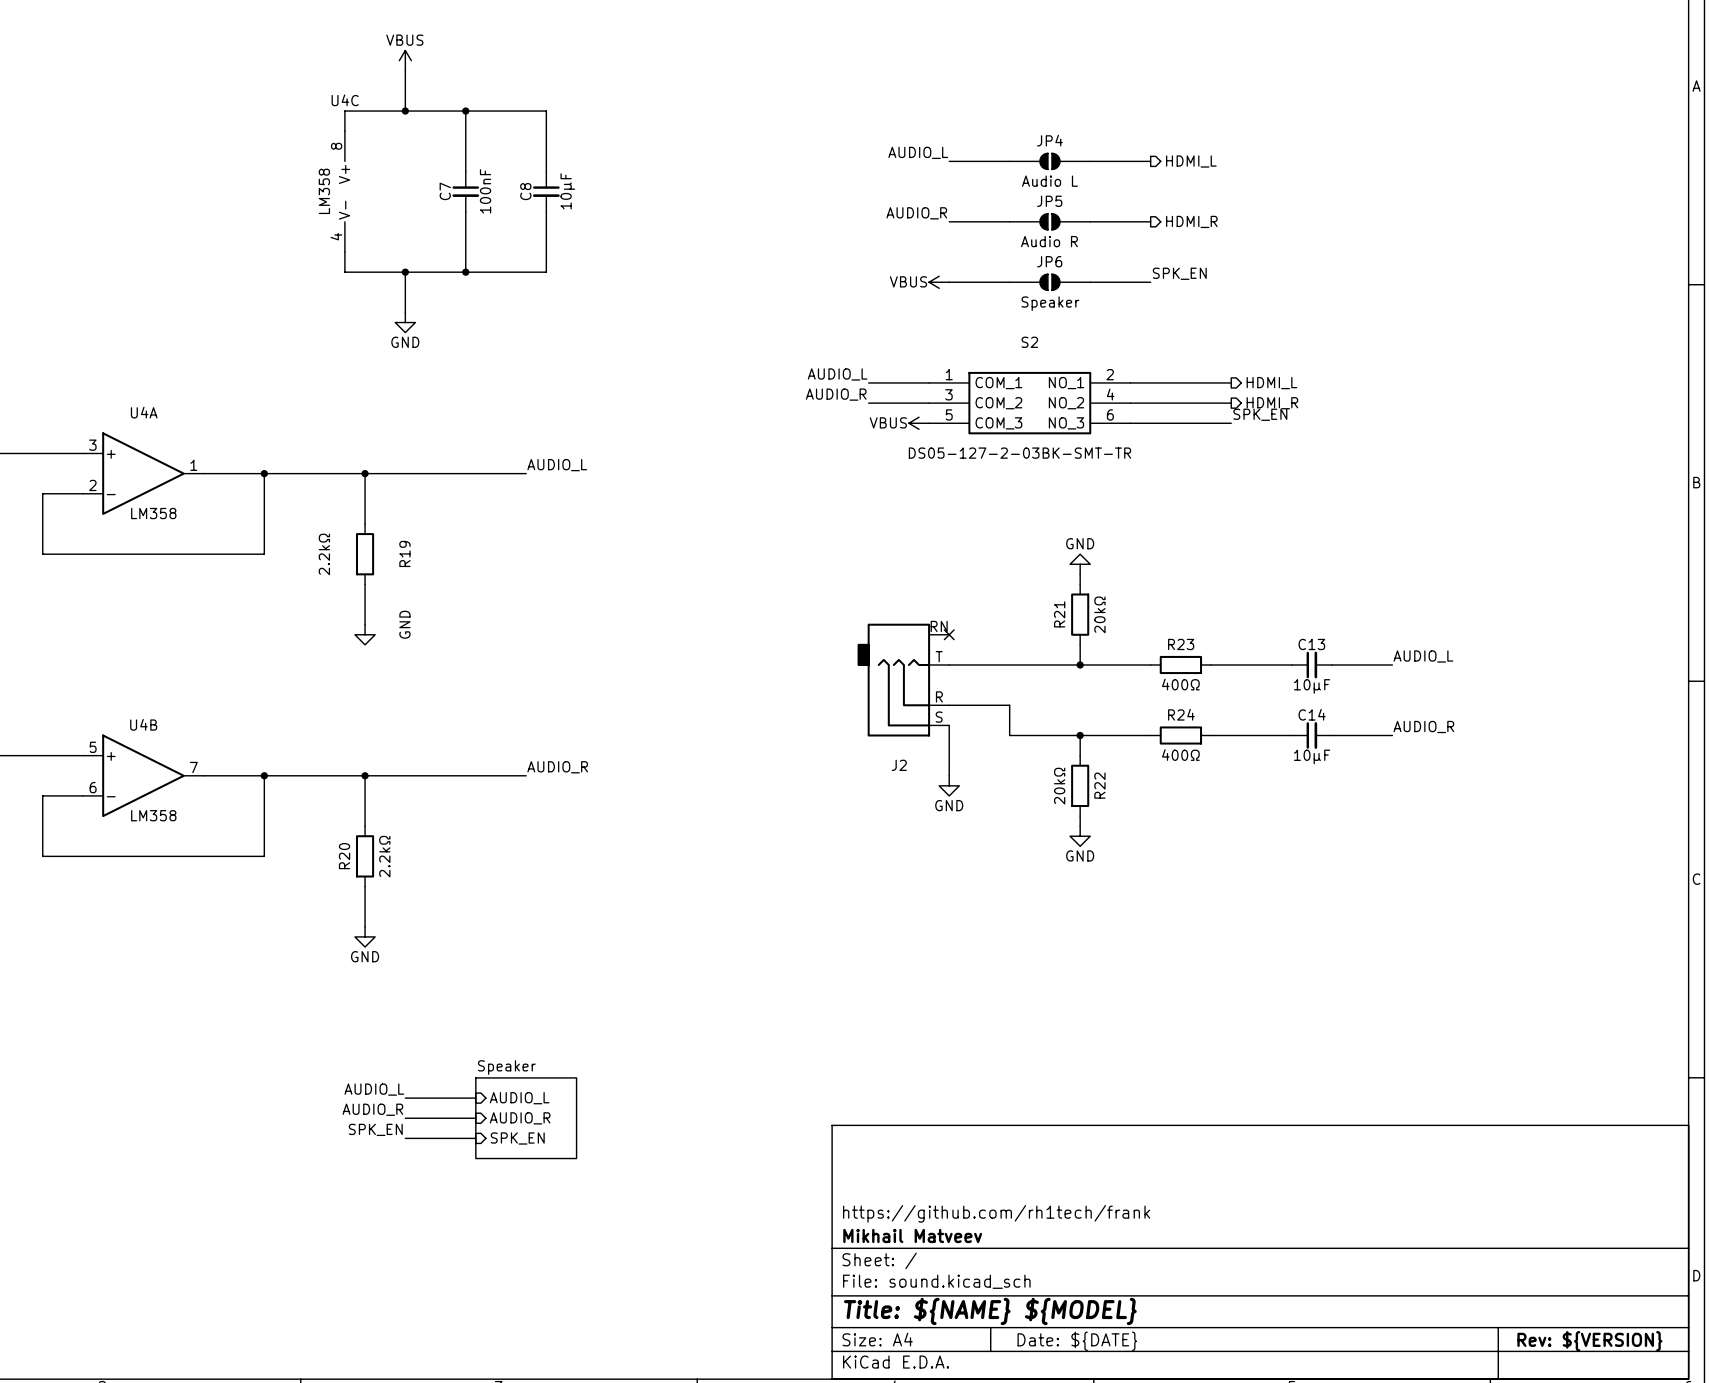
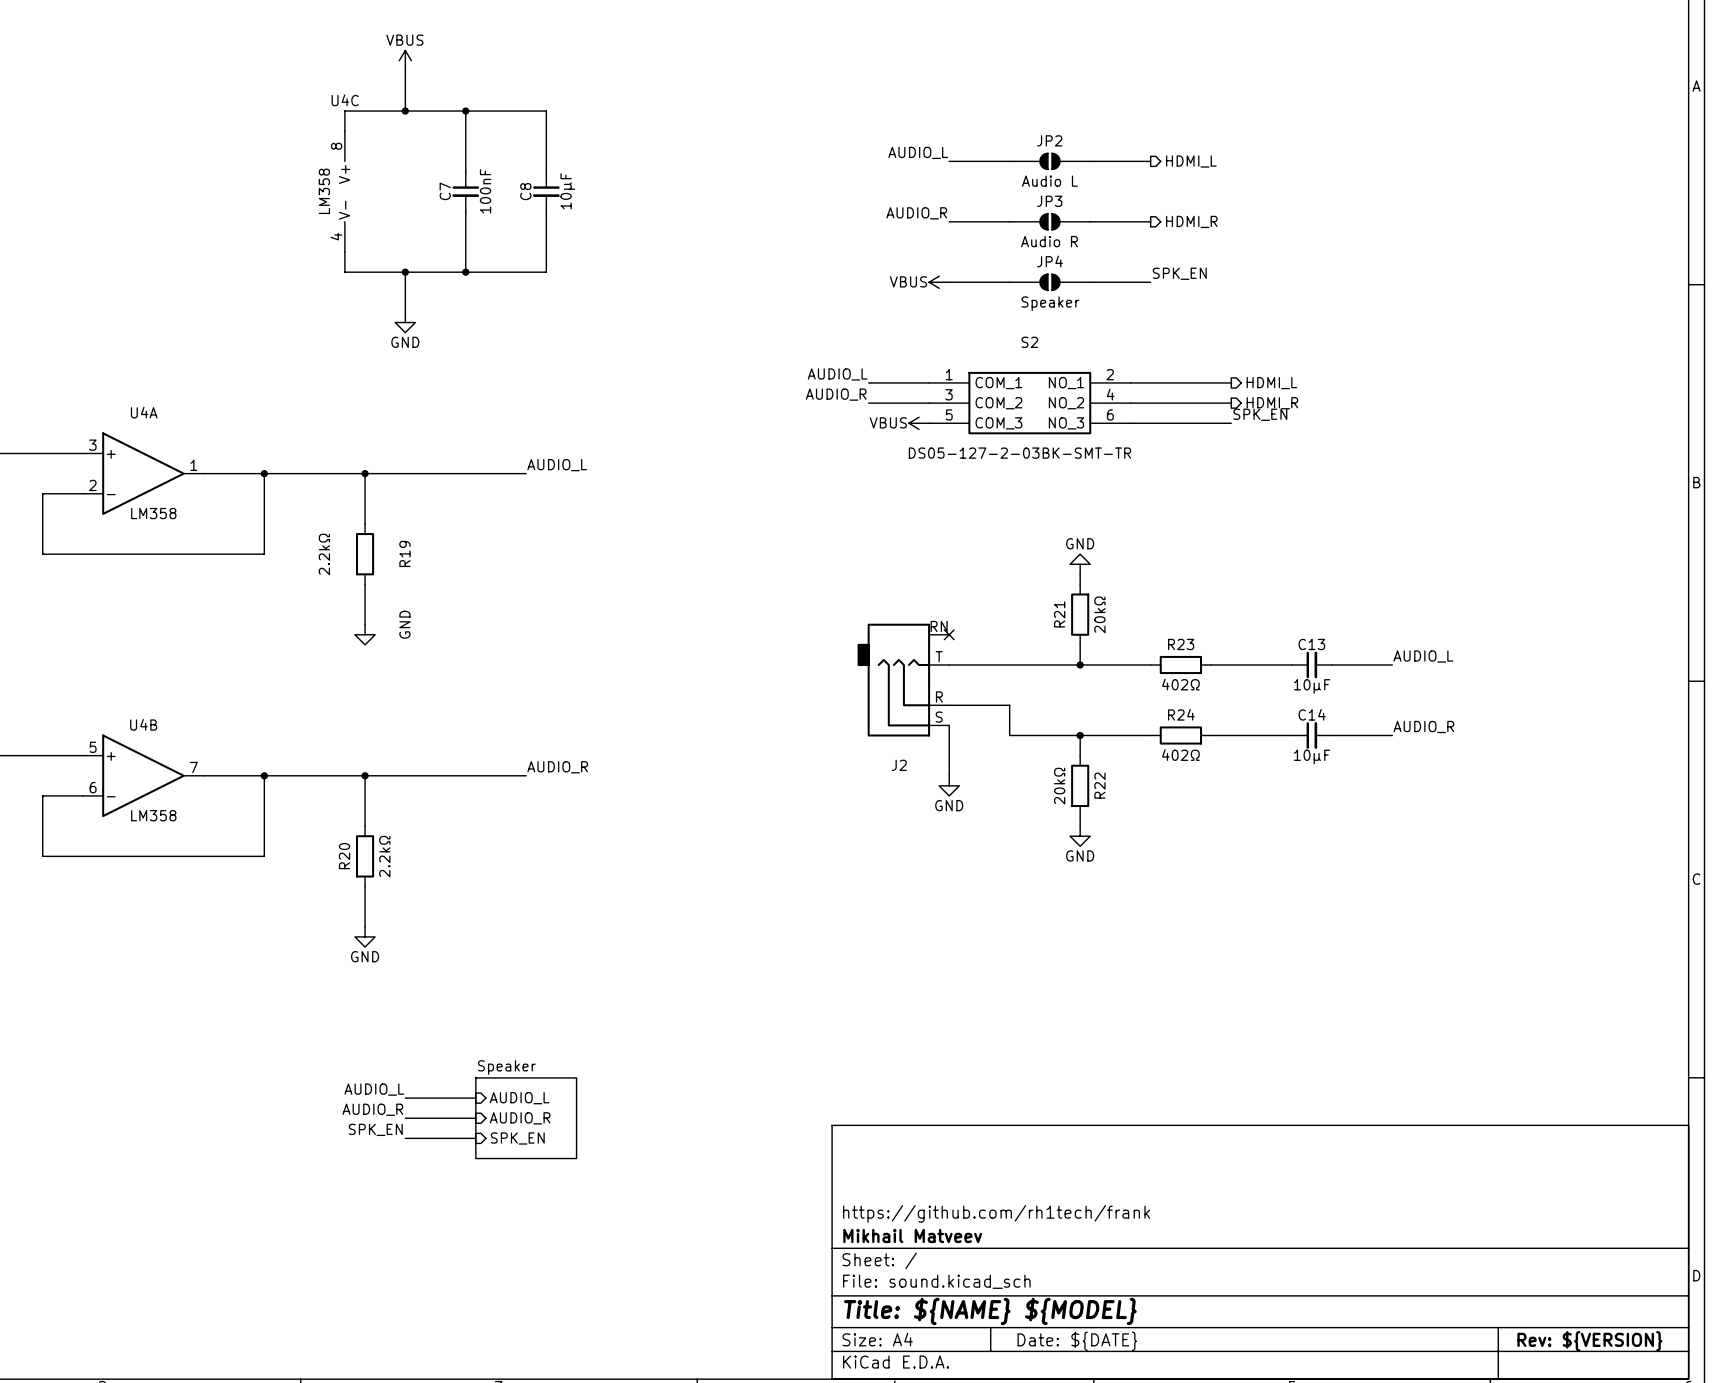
JP4 name: JP4 (1049, 140) -> JP2 (1049, 140)
JP5 name: JP5 (1049, 201) -> JP3 (1049, 201)
JP6 name: JP6 (1049, 261) -> JP4 (1049, 261)
R23 value: 400Ω (1180, 684) -> 402Ω (1180, 684)
R24 value: 400Ω (1180, 755) -> 402Ω (1180, 755)

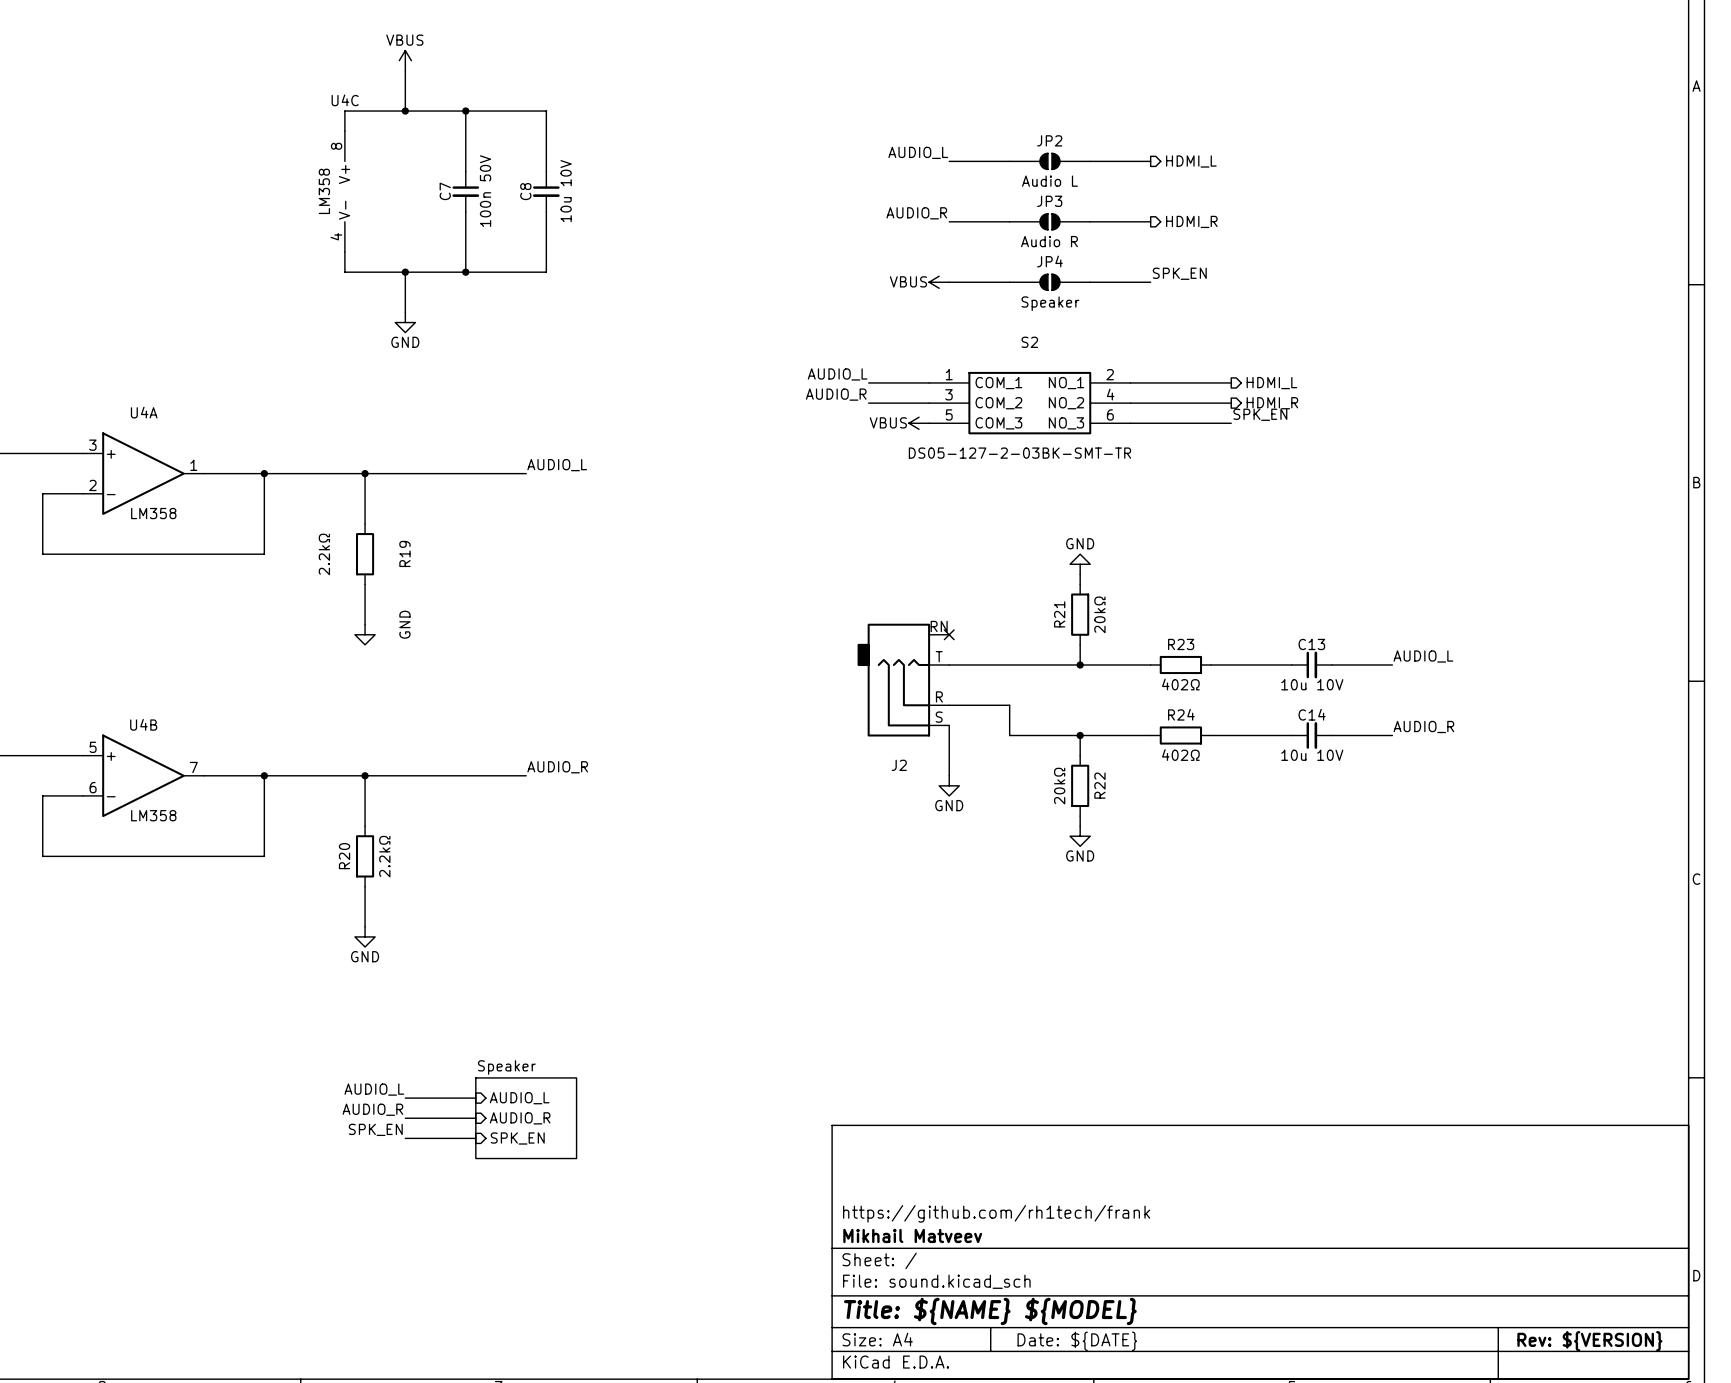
C7 value: 100nF (485, 191) -> 100n 50V (485, 191)
C8 value: 10µF (567, 191) -> 10u 10V (566, 191)
C13 value: 10µF (1312, 686) -> 10u 10V (1312, 684)
C14 value: 10µF (1312, 756) -> 10u 10V (1312, 755)

